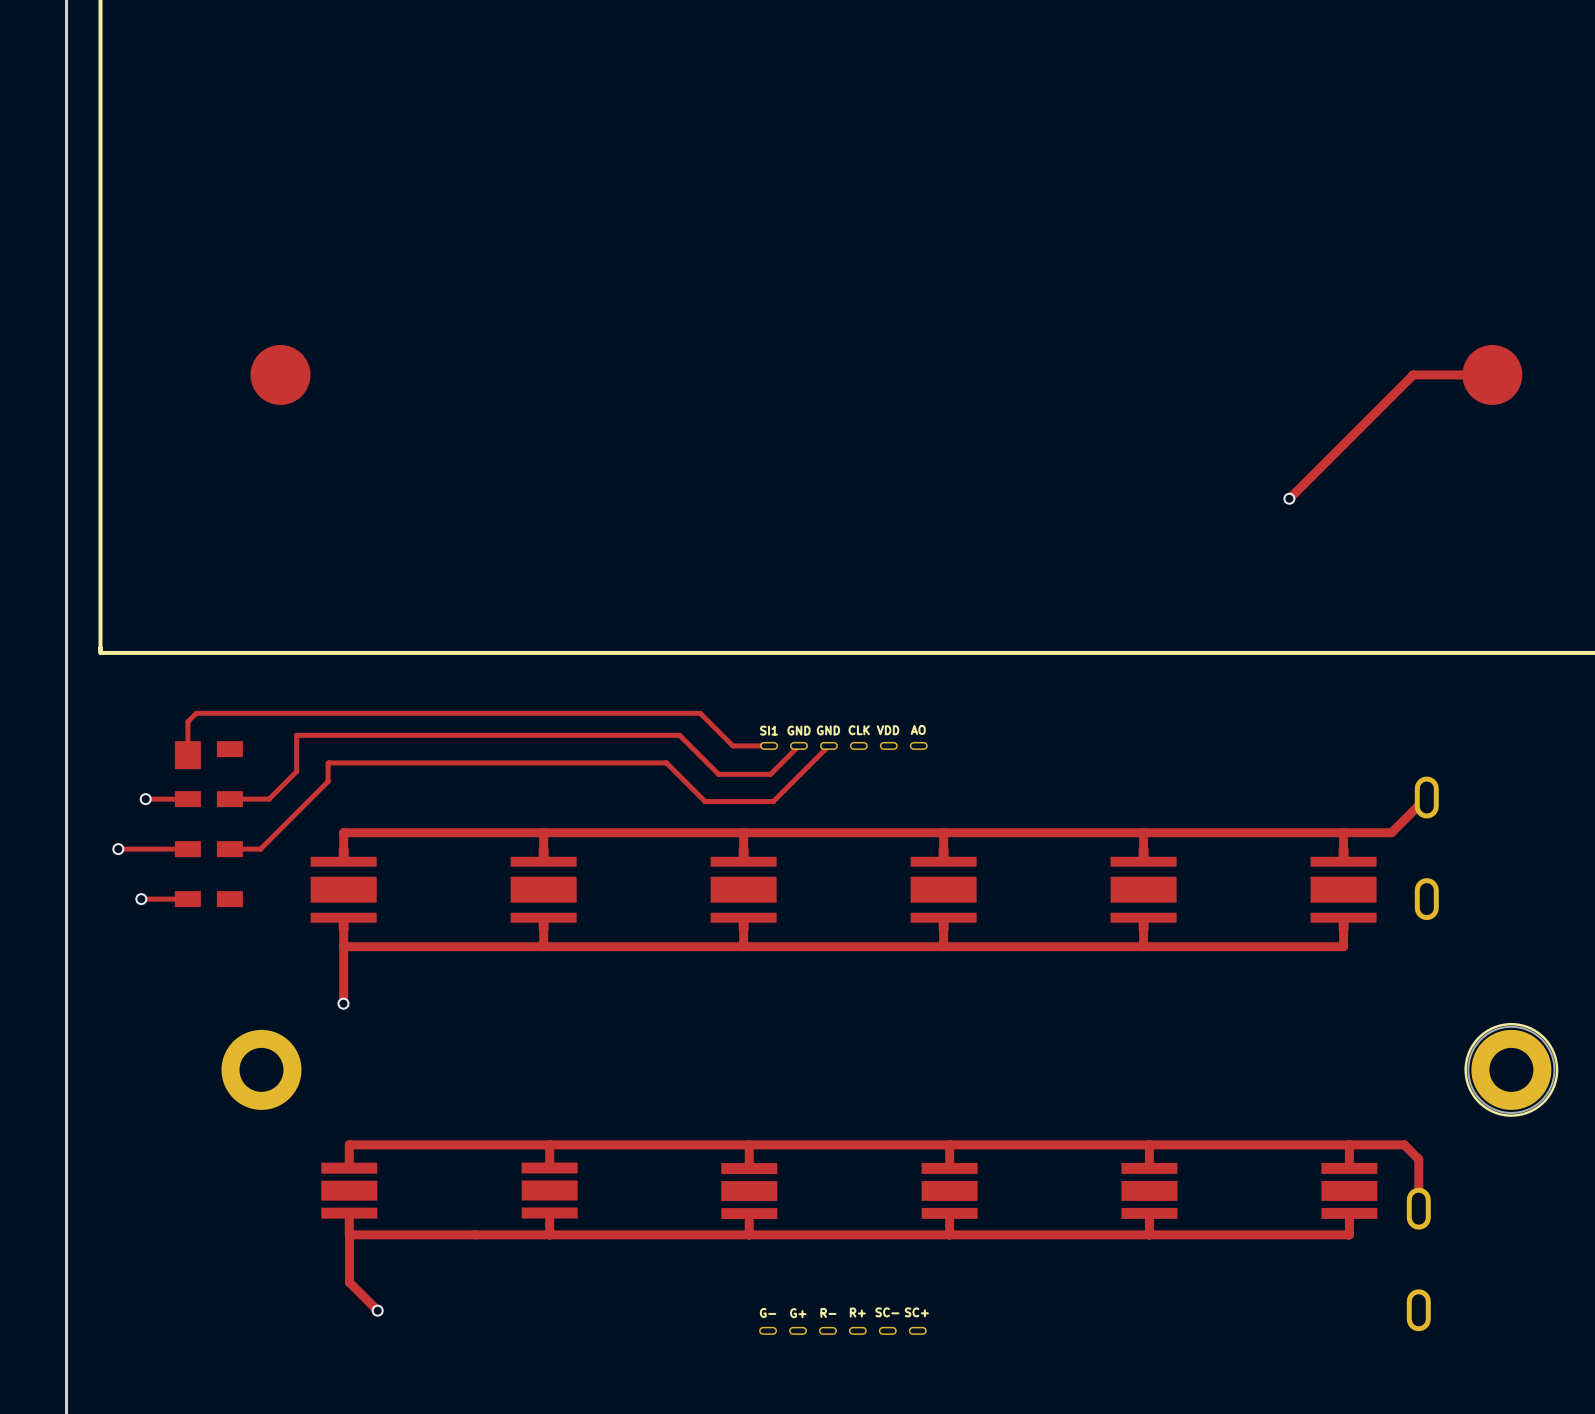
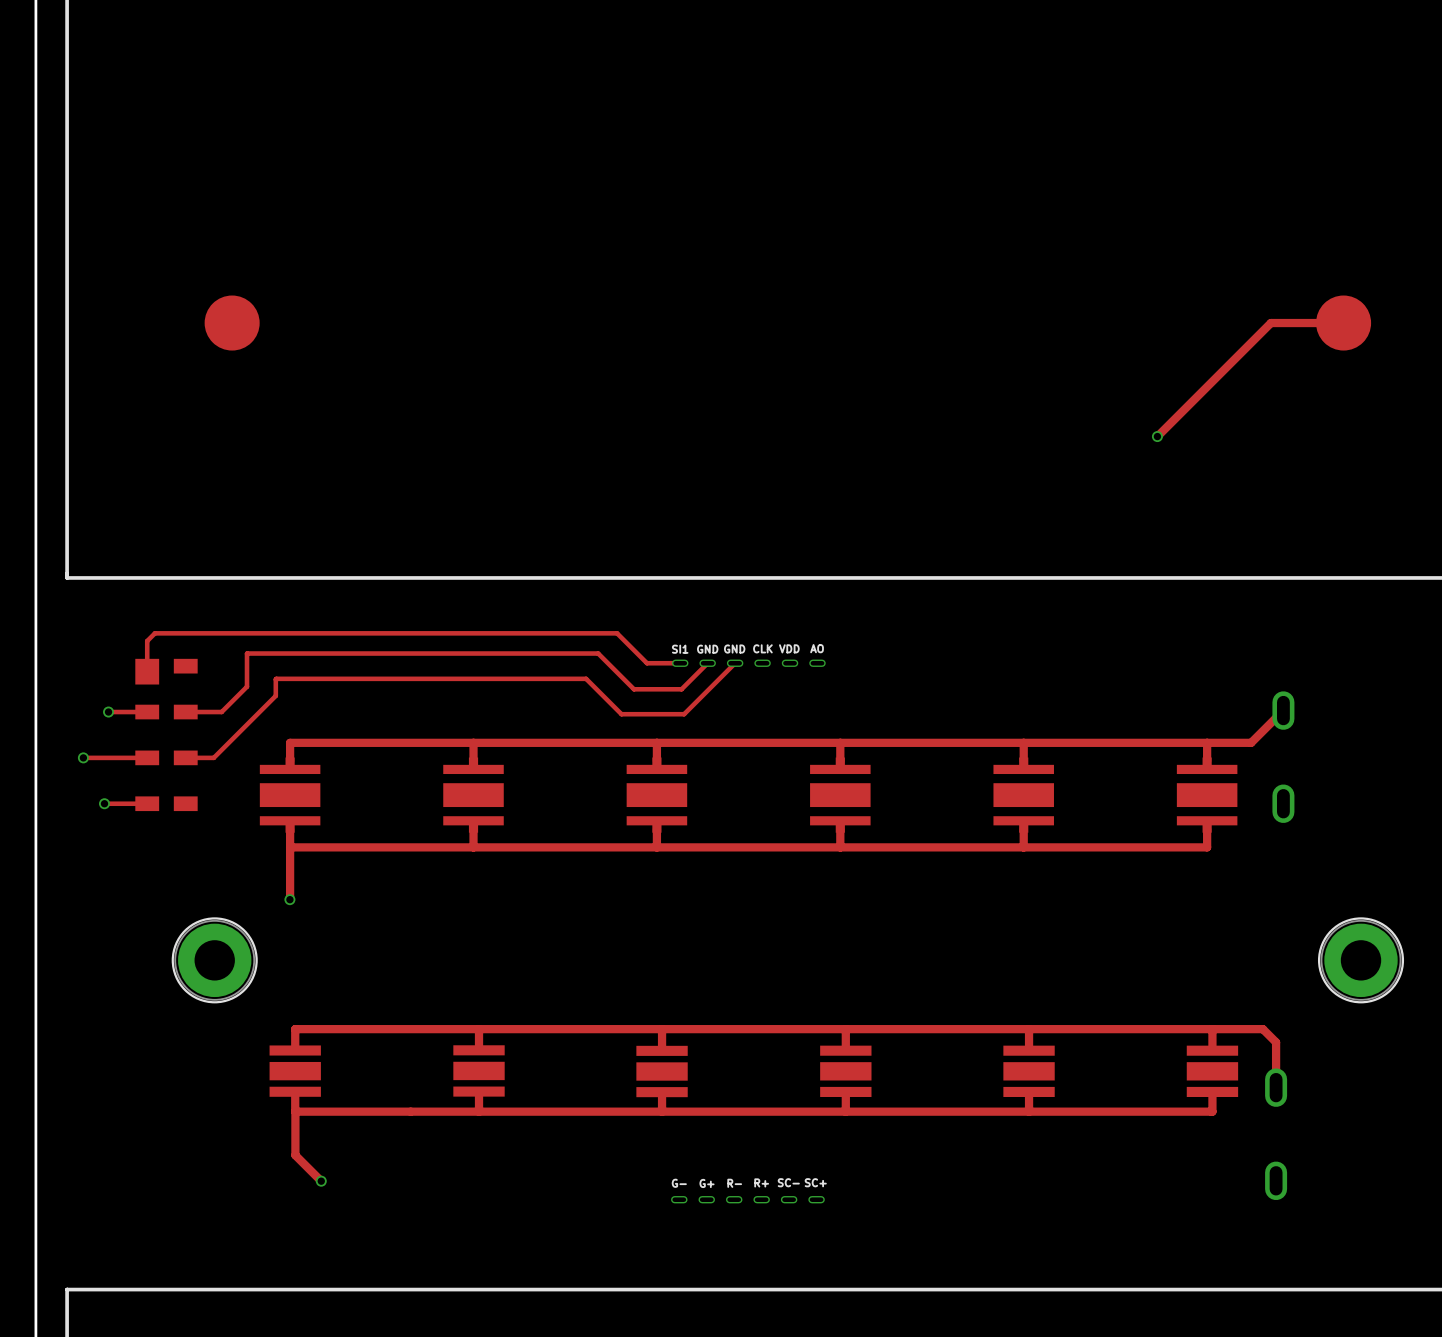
part side: bottom (261, 1069) -> top (214, 960)

